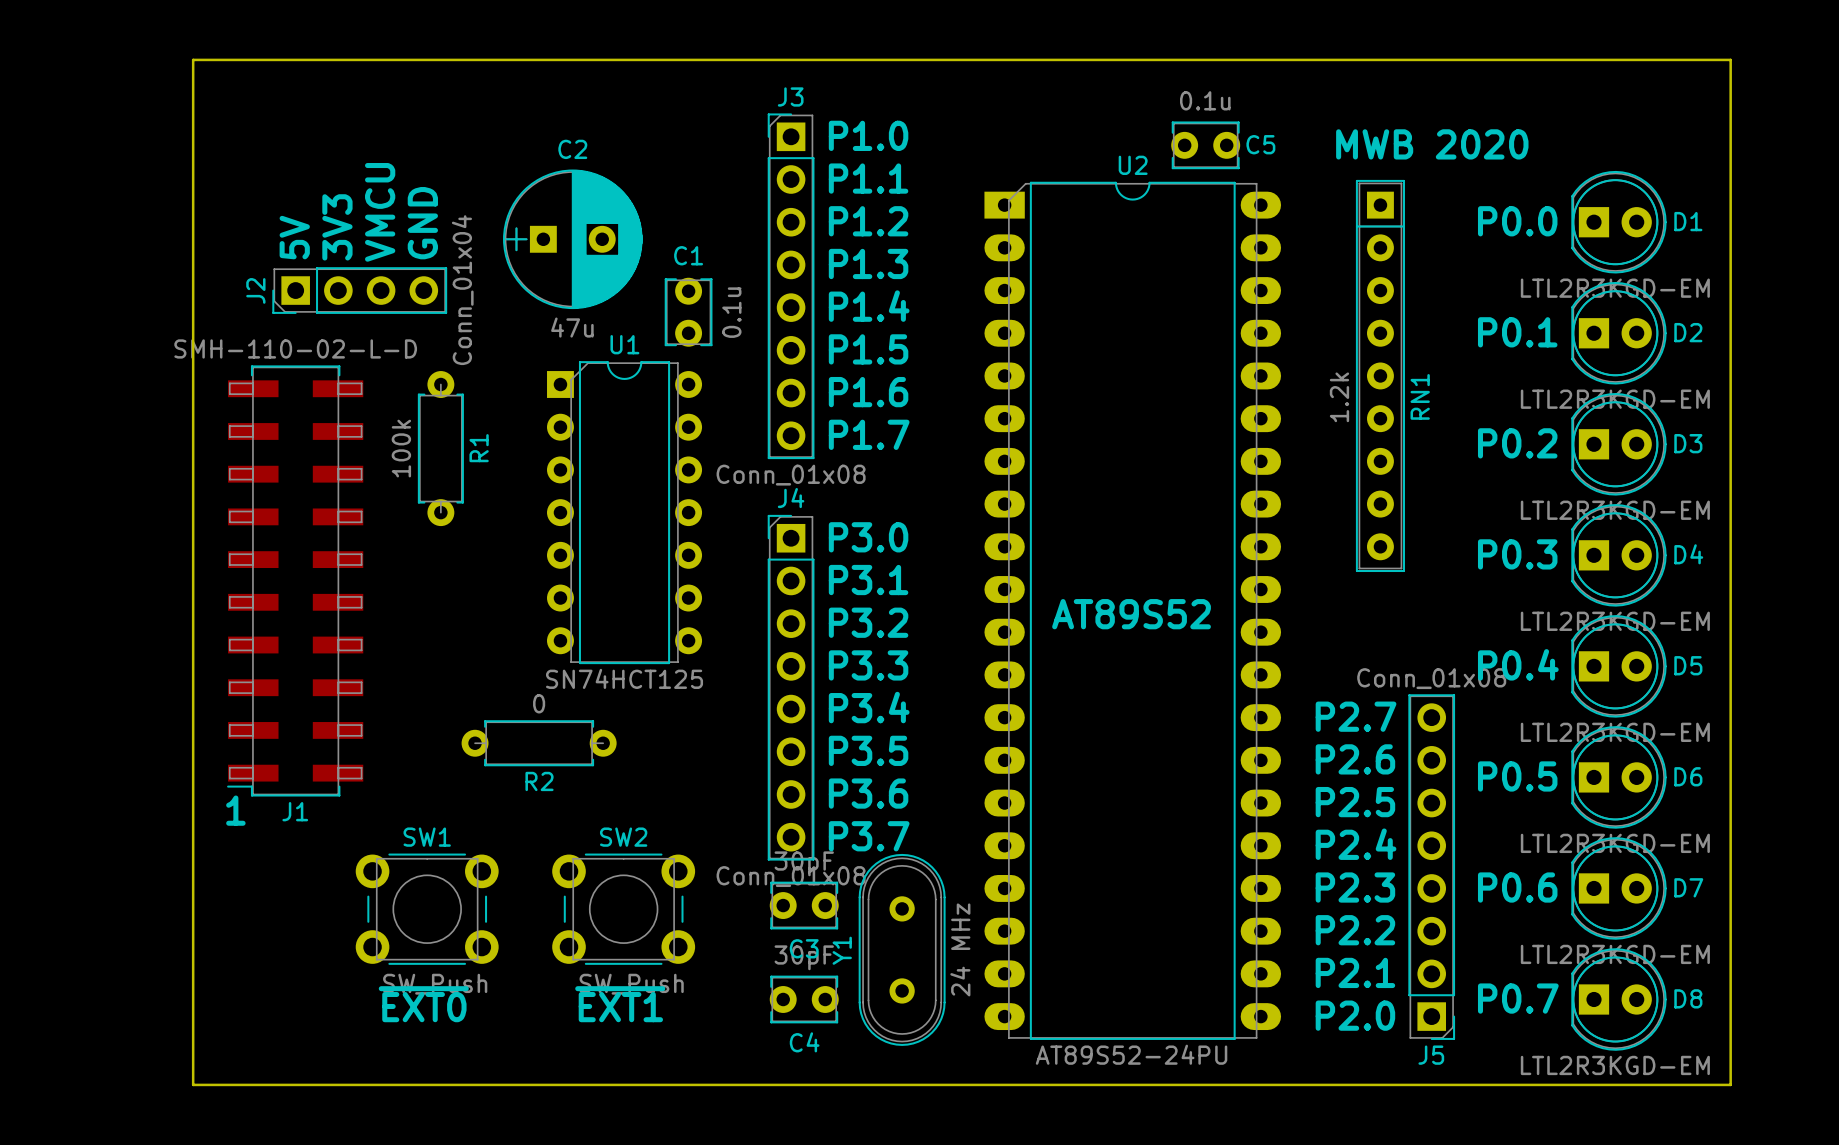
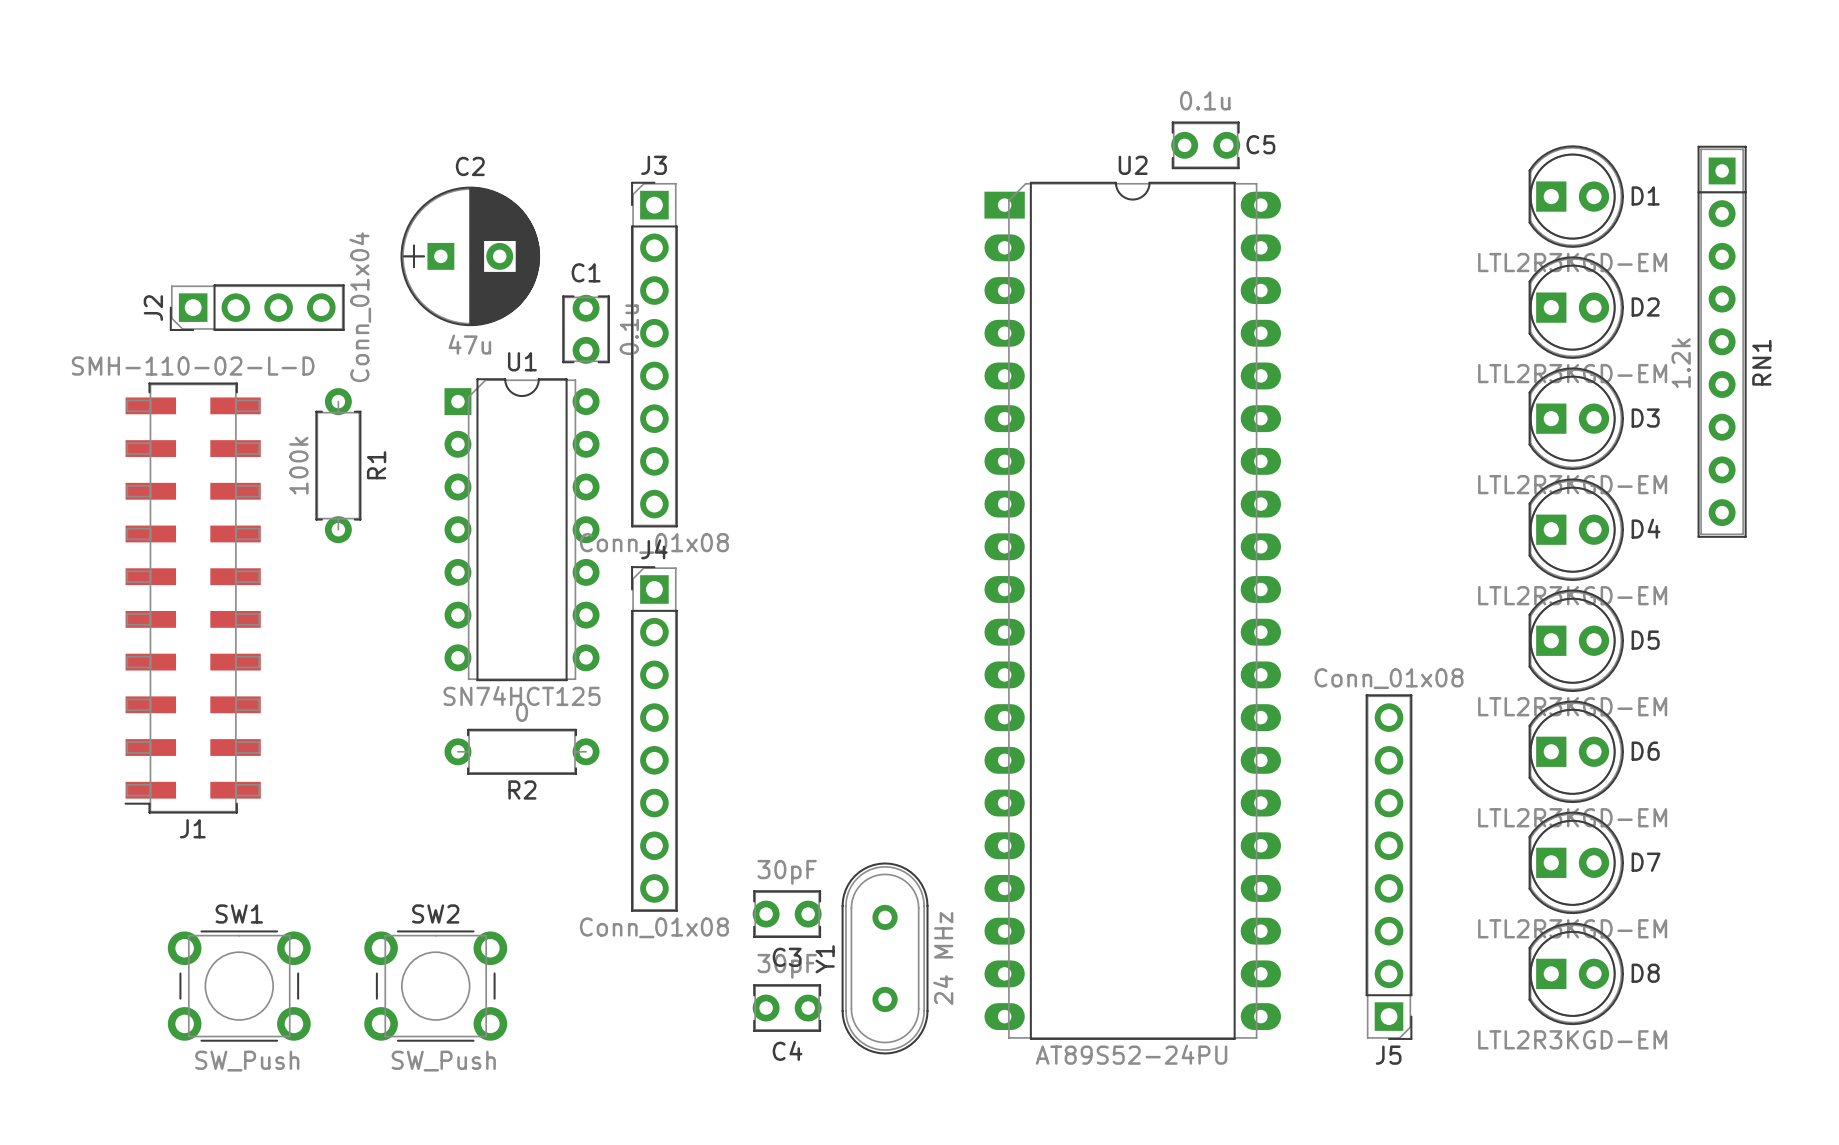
board edge: (193, 59) (1730, 59) (1730, 1084) (193, 1084) (193, 59) -> none
text: P1.0 (868, 135) -> none
text: MWB 2020 (1432, 144) -> none
text: P1.1 (868, 178) -> none
text: VMCU (380, 212) -> none
text: P1.2 (868, 221) -> none
text: P0.0 (1517, 221) -> none
D1 position: (1618, 222) -> (1576, 196)
text: GND (422, 223) -> none
text: 3V3 (337, 227) -> none
text: 5V (294, 237) -> none
C2 position: (572, 239) -> (470, 256)
text: P1.3 (868, 263) -> none
J3 position: (791, 286) -> (654, 354)
J2 position: (359, 290) -> (257, 307)
text: P1.4 (869, 306) -> none
C1 position: (688, 312) -> (586, 329)
text: P0.1 (1517, 332) -> none
D2 position: (1618, 333) -> (1576, 307)
text: P1.5 (868, 349) -> none
RN1 position: (1380, 375) -> (1722, 341)
text: P1.6 (868, 392) -> none
text: P1.7 (869, 434) -> none
text: P0.2 (1517, 443) -> none
D3 position: (1618, 444) -> (1576, 418)
R1 position: (440, 448) -> (338, 465)
U1 position: (624, 512) -> (522, 529)
text: P3.0 (868, 537) -> none
text: P0.3 (1517, 554) -> none
D4 position: (1618, 555) -> (1576, 529)
J1 position: (295, 580) -> (192, 598)
text: P3.1 (868, 580) -> none
text: AT89S52 (1131, 614) -> none
text: P3.2 (868, 622) -> none
text: P0.4 (1518, 664) -> none
text: P3.3 (868, 665) -> none
D5 position: (1618, 666) -> (1576, 640)
J4 position: (791, 687) -> (654, 738)
text: P3.4 (869, 707) -> none
text: P2.7 (1356, 716) -> none
R2 position: (539, 743) -> (522, 751)
text: P3.5 (868, 750) -> none
text: P2.6 (1355, 759) -> none
text: P0.5 (1517, 776) -> none
D6 position: (1618, 777) -> (1576, 751)
text: P3.6 (868, 793) -> none
text: P2.5 (1355, 802) -> none
text: 1 (235, 810) -> none
text: P3.7 (869, 836) -> none
text: P2.4 (1356, 844) -> none
J5 position: (1431, 867) -> (1389, 867)
text: P2.3 (1355, 887) -> none
text: P0.6 (1517, 887) -> none
D7 position: (1618, 888) -> (1576, 862)
C3 position: (804, 905) -> (787, 914)
SW1 position: (427, 909) -> (239, 986)
SW2 position: (623, 909) -> (435, 986)
text: P2.2 (1355, 930) -> none
Y1 position: (902, 949) -> (885, 958)
text: P2.1 (1355, 972) -> none
text: P0.7 (1518, 998) -> none
C4 position: (804, 999) -> (787, 1008)
D8 position: (1618, 999) -> (1576, 973)
text: ~{EXT0} (423, 1004) -> none
text: ~{EXT1} (620, 1004) -> none
text: P2.0 (1355, 1015) -> none

